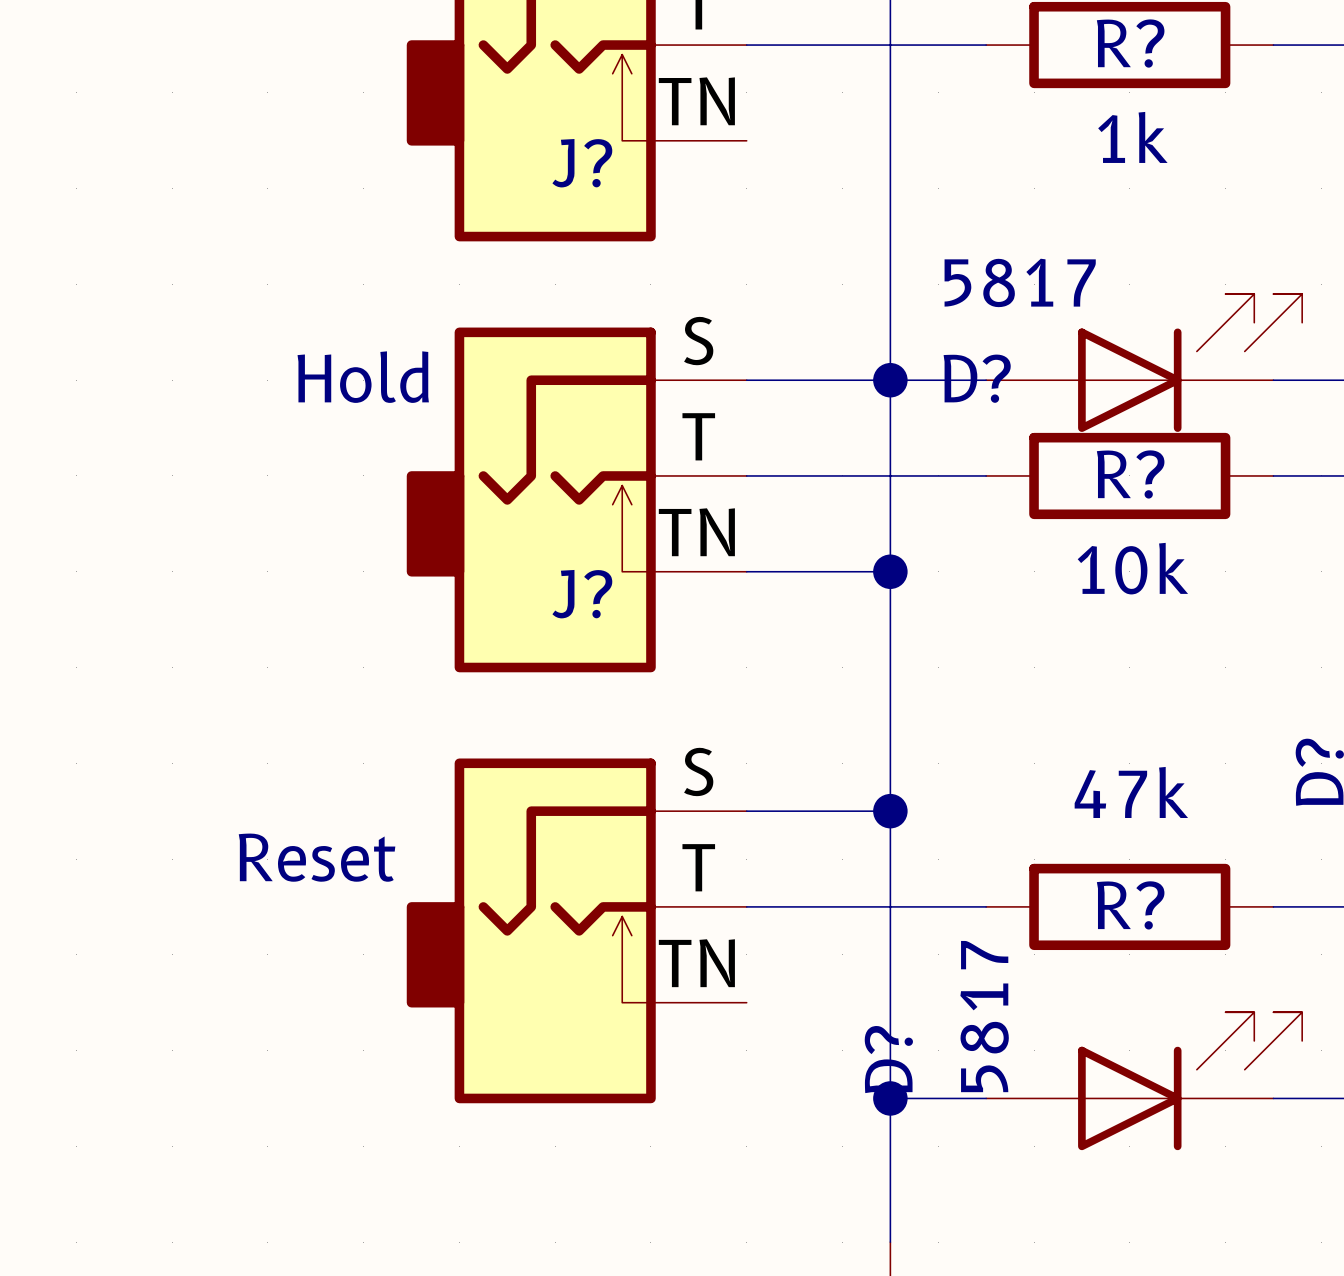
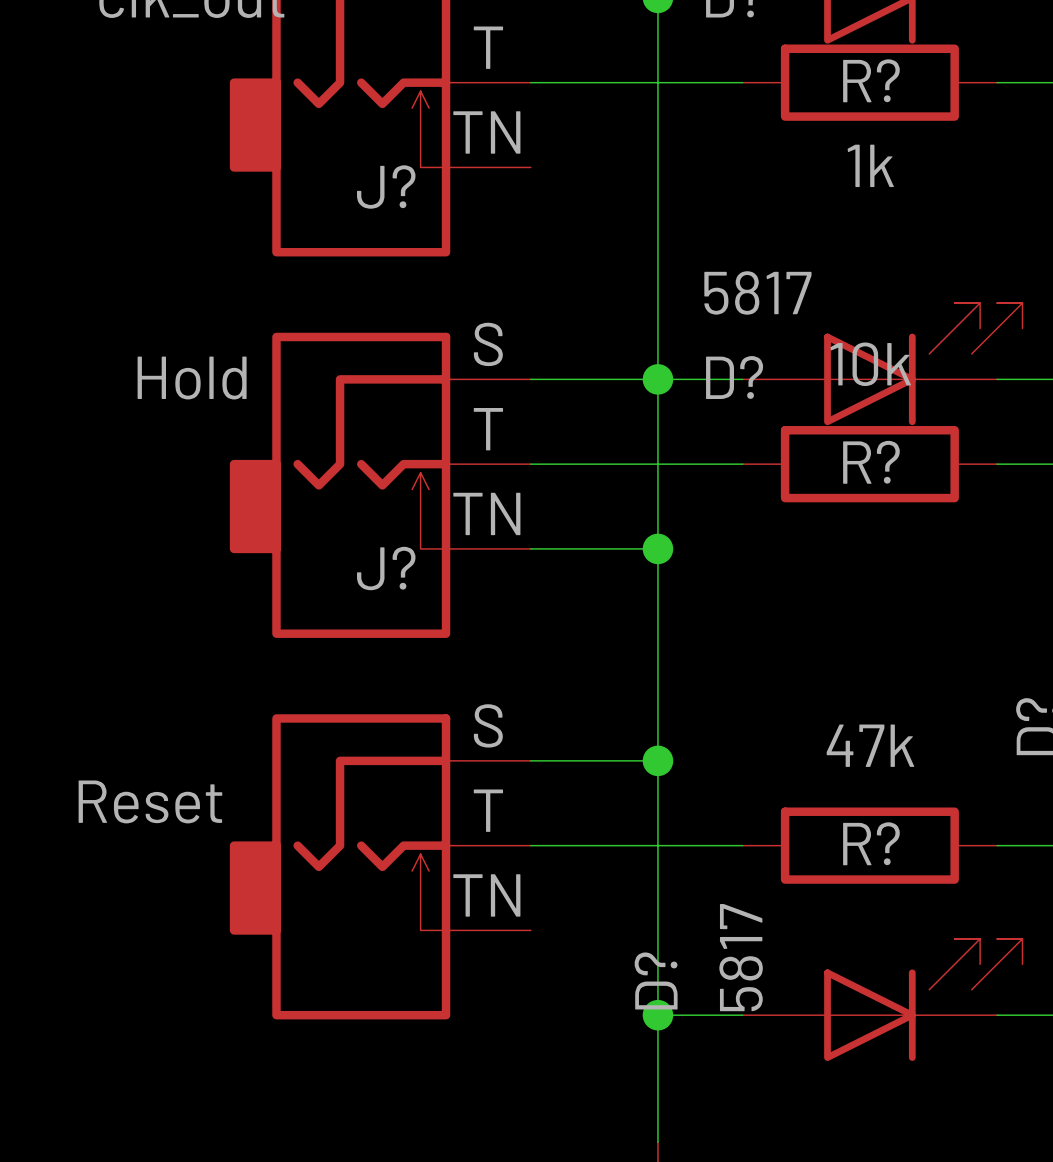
R? value position: 10k (1132, 568) -> 10k (870, 364)

